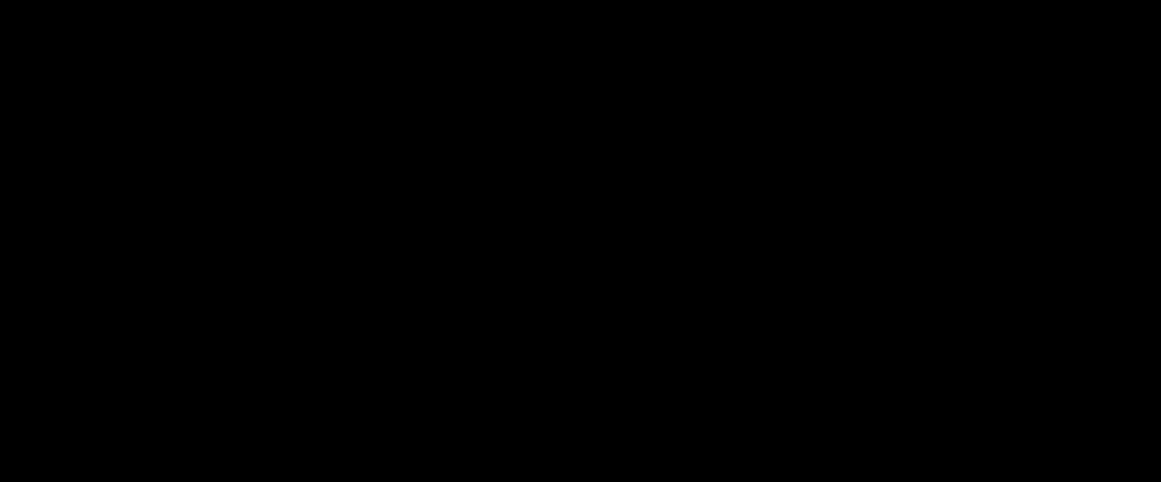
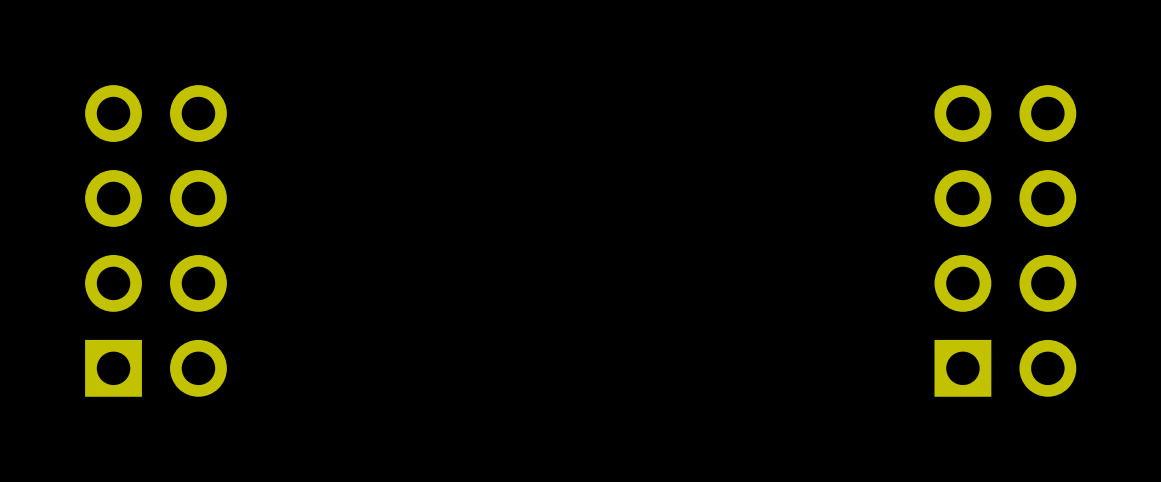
part: none -> (155, 240)
part: none -> (1005, 240)

